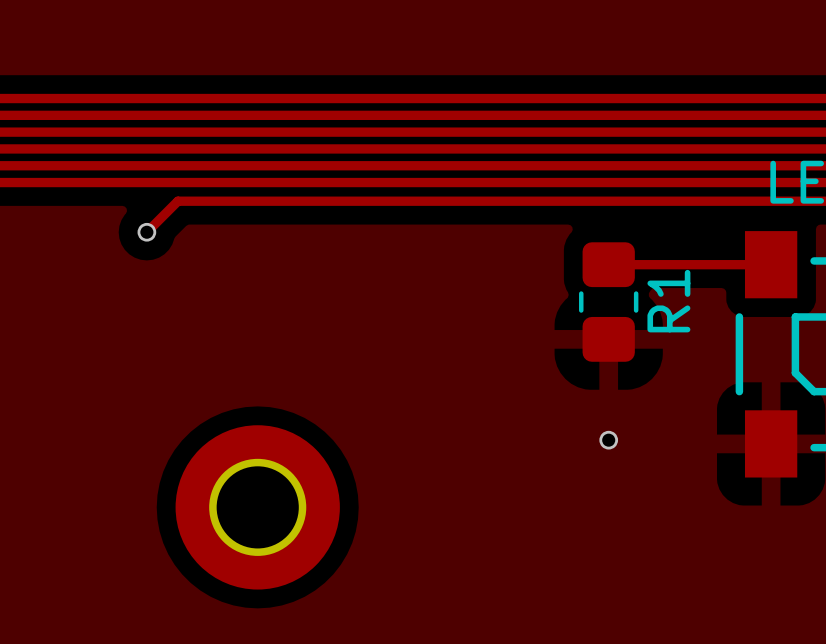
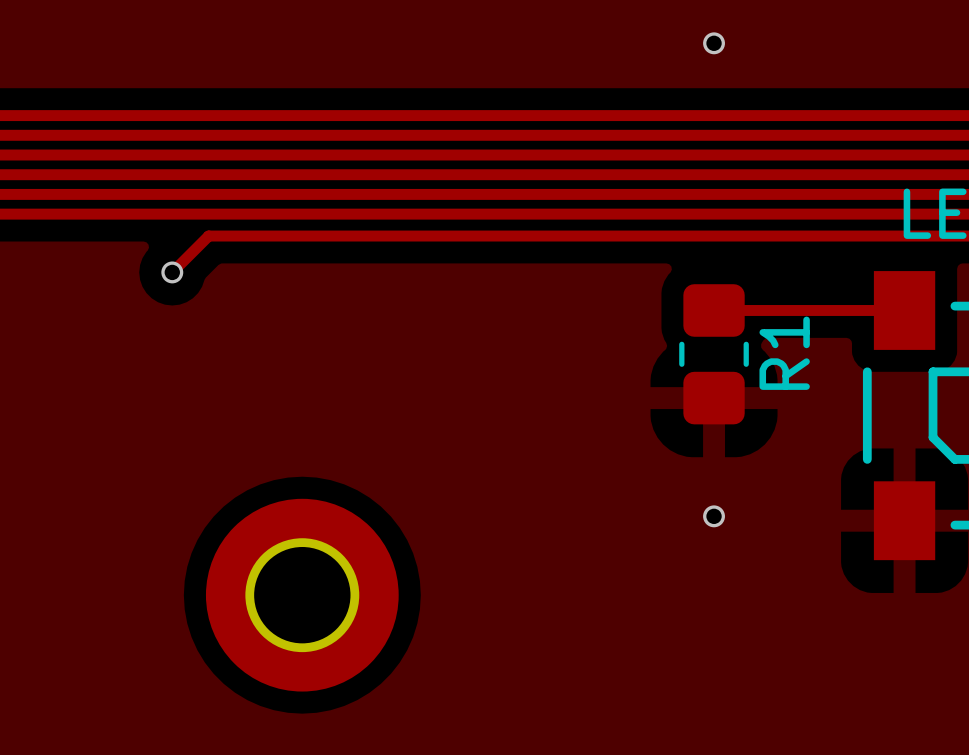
via: none -> (714, 43)

